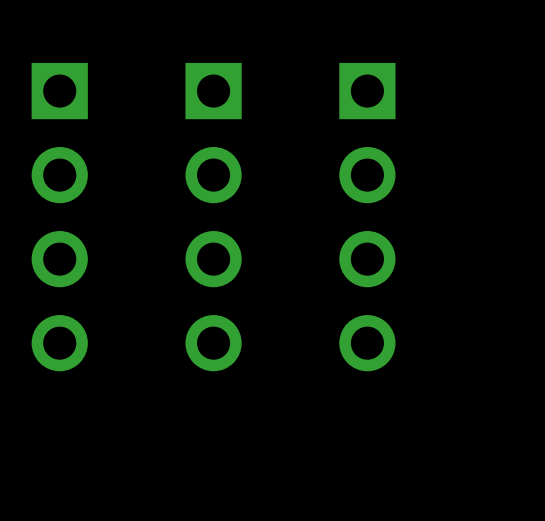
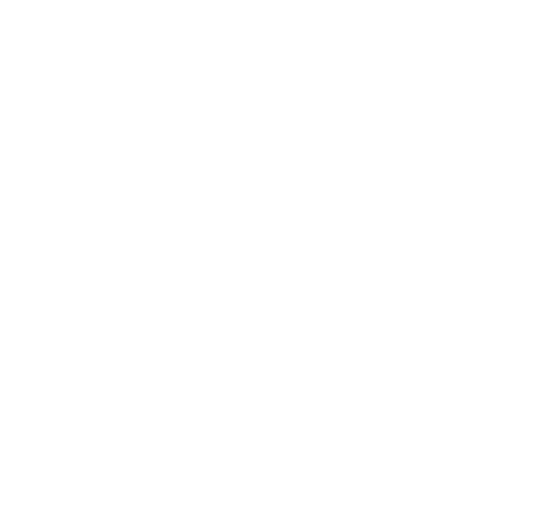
part: (59, 217) -> none
part: (213, 217) -> none
part: (367, 217) -> none

